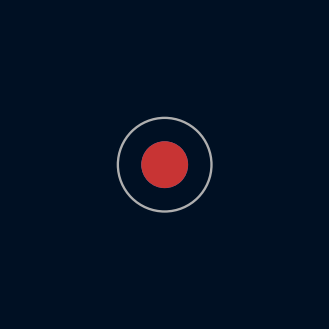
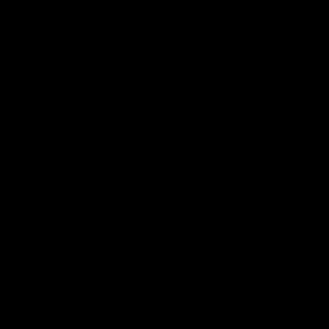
part: (164, 164) -> none

